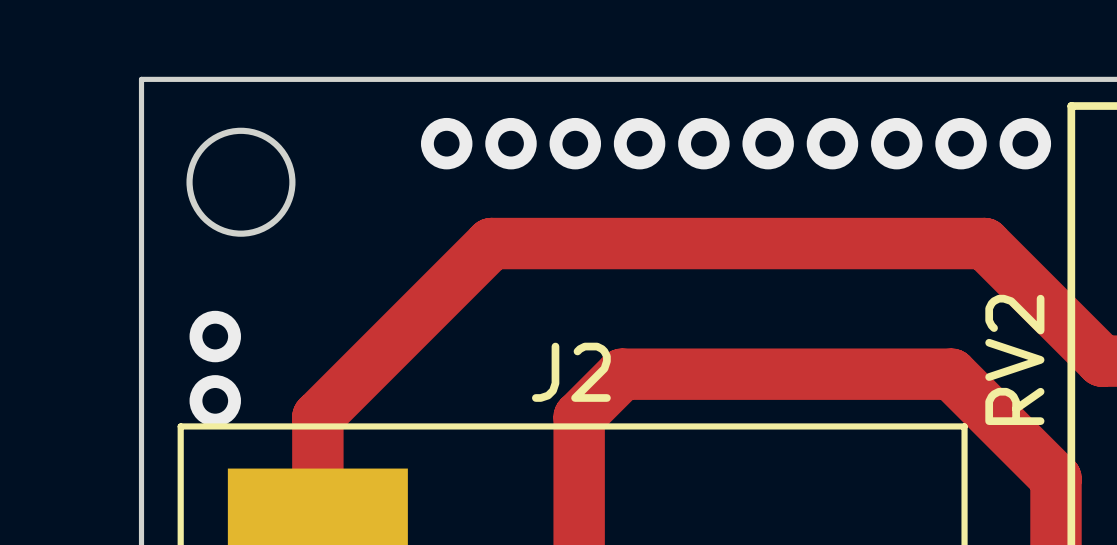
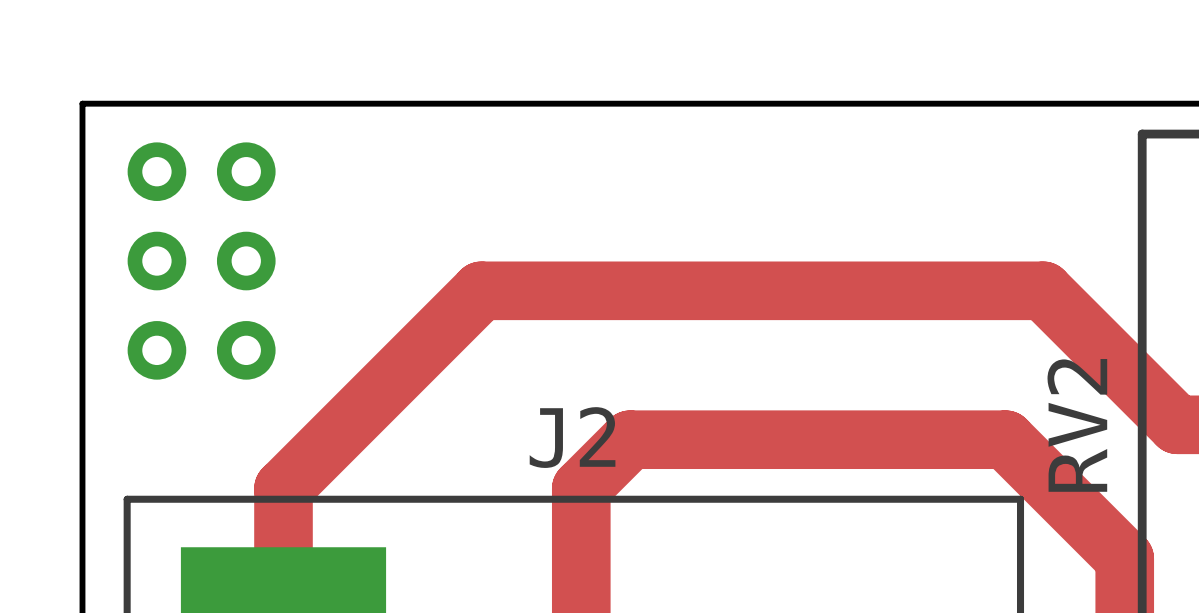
round board edge: [186, 127, 296, 237] -> none
via: none -> (156, 171)
via: none -> (246, 171)
via: (446, 143) -> none
via: (511, 143) -> none
via: (575, 143) -> none
via: (639, 143) -> none
via: (703, 143) -> none
via: (768, 143) -> none
via: (832, 143) -> none
via: (896, 143) -> none
via: (961, 143) -> none
via: (1025, 143) -> none
via: none -> (156, 261)
via: none -> (246, 261)
via: none -> (246, 350)
via position: (215, 336) -> (156, 350)
via: (215, 400) -> none

